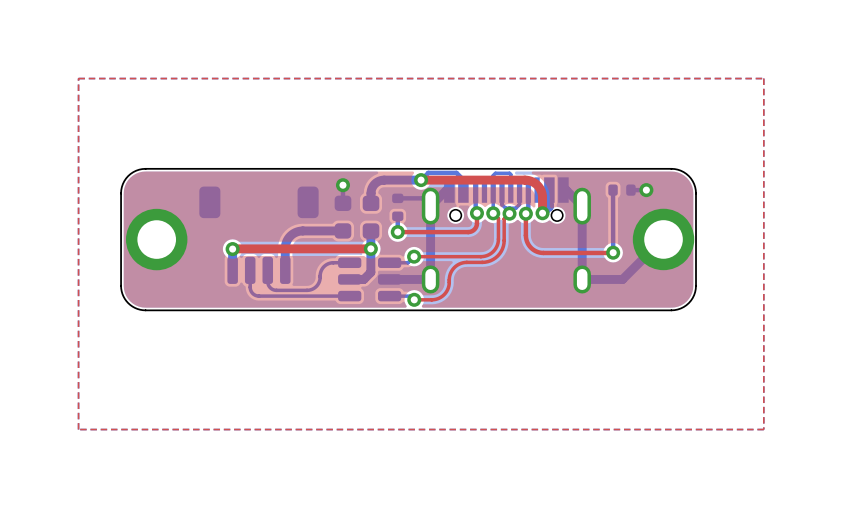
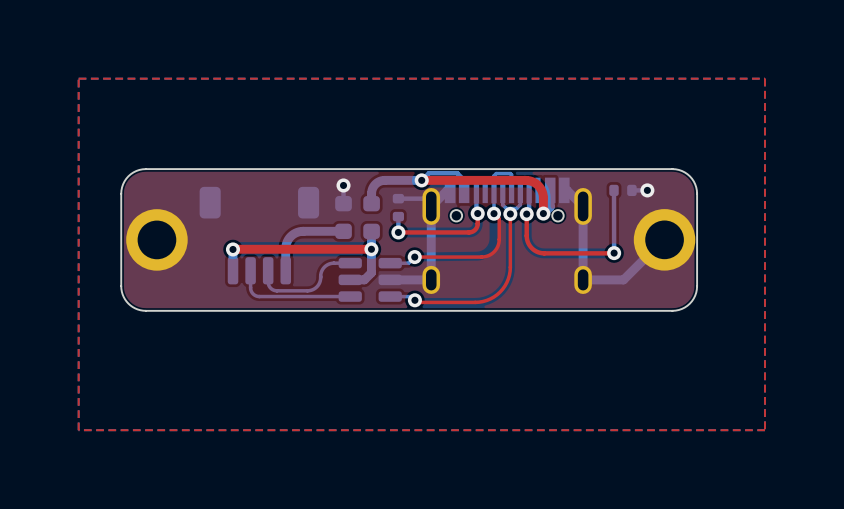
top track: (509, 213) (504, 218) (503, 243) (497, 255) (487, 261) (459, 264) (451, 272) (448, 288) (442, 296) (433, 299) (414, 299) -> (510, 214) (510, 271) (506, 282) (500, 292) (490, 298) (479, 302) (417, 302) (414, 300)

